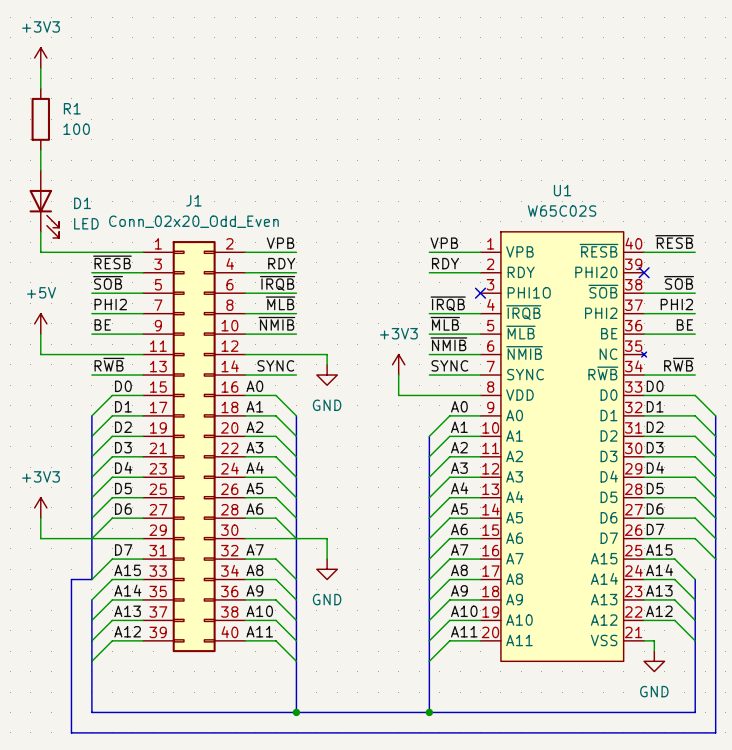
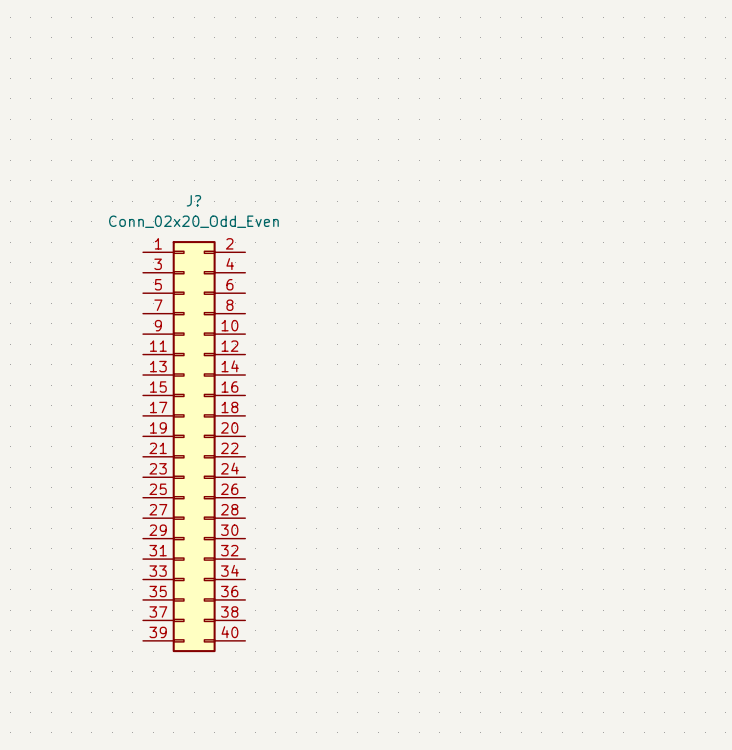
power symbol: +3V3 (40, 58) -> none
wire: (40, 68) (40, 88) -> none
R1: 100 (40, 119) -> none
wire: (40, 150) (40, 170) -> none
J1 name: J1 (193, 200) -> J? (193, 200)
D1: LED (44, 204) -> none
wire: (40, 231) (40, 252) (143, 252) -> none
label: ~{RESB} (674, 241) -> none
label: VPB (280, 243) -> none
label: VPB (444, 243) -> none
wire: (245, 252) (296, 252) -> none
wire: (429, 252) (480, 252) -> none
wire: (644, 252) (695, 252) -> none
label: ~{RESB} (112, 262) -> none
label: RDY (281, 263) -> none
label: RDY (445, 263) -> none
wire: (91, 272) (143, 272) -> none
wire: (245, 272) (296, 272) -> none
wire: (429, 272) (480, 272) -> none
no-connect mark: (644, 272) -> none
label: ~{SOB} (108, 282) -> none
label: ~{SOB} (679, 282) -> none
label: ~{IRQB} (277, 283) -> none
wire: (91, 293) (143, 293) -> none
wire: (245, 293) (296, 293) -> none
no-connect mark: (480, 293) -> none
wire: (644, 293) (695, 293) -> none
label: ~{MLB} (280, 303) -> none
label: ~{IRQB} (448, 303) -> none
label: PHI2 (110, 304) -> none
label: PHI2 (676, 304) -> none
wire: (91, 313) (143, 313) -> none
wire: (245, 313) (296, 313) -> none
wire: (429, 313) (480, 313) -> none
wire: (644, 313) (695, 313) -> none
power symbol: +5V (40, 323) -> none
label: ~{NMIB} (276, 323) -> none
label: ~{MLB} (445, 323) -> none
label: BE (102, 324) -> none
label: BE (684, 324) -> none
wire: (40, 334) (40, 354) (143, 354) -> none
wire: (91, 334) (143, 334) -> none
wire: (245, 334) (296, 334) -> none
wire: (429, 334) (480, 334) -> none
wire: (644, 334) (695, 334) -> none
label: ~{NMIB} (448, 344) -> none
wire: (245, 354) (327, 354) (327, 364) -> none
wire: (429, 354) (480, 354) -> none
label: R~{WB} (109, 364) -> none
power symbol: +3V3 (398, 364) -> none
label: R~{WB} (679, 364) -> none
label: SYNC (275, 365) -> none
label: SYNC (449, 365) -> none
wire: (91, 375) (143, 375) -> none
wire: (245, 375) (296, 375) -> none
power symbol: GND (327, 375) -> none
wire: (398, 375) (398, 395) (480, 395) -> none
wire: (429, 375) (480, 375) -> none
wire: (644, 375) (695, 375) -> none
label: D0 (123, 386) -> none
label: A0 (254, 386) -> none
label: D0 (655, 386) -> none
wire: (143, 395) (112, 395) (91, 415) -> none
wire: (245, 395) (275, 395) (296, 415) -> none
wire: (644, 395) (695, 395) (715, 415) -> none
label: D1 (123, 406) -> none
label: A1 (254, 406) -> none
label: A0 (459, 406) -> none
label: D1 (655, 406) -> none
bus: (91, 415) (91, 579) (71, 579) (71, 732) (715, 732) (715, 415) -> none
wire: (143, 415) (112, 415) (91, 436) -> none
wire: (245, 415) (275, 415) (296, 436) -> none
bus: (296, 415) (296, 712) -> none
wire: (480, 415) (449, 415) (429, 436) -> none
wire: (644, 415) (695, 415) (715, 436) -> none
label: D2 (123, 427) -> none
label: A2 (254, 427) -> none
label: A1 (459, 427) -> none
label: D2 (655, 427) -> none
wire: (143, 436) (112, 436) (91, 456) -> none
wire: (245, 436) (275, 436) (296, 456) -> none
bus: (429, 436) (429, 712) -> none
wire: (480, 436) (449, 436) (429, 456) -> none
wire: (644, 436) (695, 436) (715, 456) -> none
U1: W65C02S (563, 446) -> none
label: D3 (123, 447) -> none
label: A3 (254, 447) -> none
label: A2 (459, 447) -> none
label: D3 (655, 447) -> none
wire: (143, 456) (112, 456) (91, 477) -> none
wire: (245, 456) (275, 456) (296, 477) -> none
wire: (480, 456) (449, 456) (429, 477) -> none
wire: (644, 456) (695, 456) (715, 477) -> none
label: D4 (123, 467) -> none
label: A4 (255, 467) -> none
label: D4 (655, 467) -> none
label: A3 (459, 468) -> none
wire: (143, 477) (112, 477) (91, 497) -> none
wire: (245, 477) (275, 477) (296, 497) -> none
wire: (480, 477) (449, 477) (429, 497) -> none
wire: (644, 477) (695, 477) (715, 497) -> none
label: D5 (123, 488) -> none
label: A5 (254, 488) -> none
label: A4 (459, 488) -> none
label: D5 (655, 488) -> none
wire: (143, 497) (112, 497) (91, 518) -> none
wire: (245, 497) (275, 497) (296, 518) -> none
wire: (480, 497) (449, 497) (429, 518) -> none
wire: (644, 497) (695, 497) (715, 518) -> none
power symbol: +3V3 (40, 507) -> none
label: D6 (123, 509) -> none
label: A6 (254, 509) -> none
label: A5 (459, 509) -> none
label: D6 (655, 509) -> none
wire: (40, 518) (40, 538) (143, 538) -> none
wire: (143, 518) (112, 518) (91, 538) -> none
wire: (245, 518) (275, 518) (296, 538) -> none
wire: (480, 518) (449, 518) (429, 538) -> none
wire: (644, 518) (695, 518) (715, 538) -> none
label: A6 (459, 529) -> none
label: D7 (655, 529) -> none
wire: (245, 538) (327, 538) (327, 559) -> none
wire: (480, 538) (449, 538) (429, 559) -> none
wire: (644, 538) (695, 538) (715, 559) -> none
label: D7 (123, 549) -> none
label: A7 (255, 549) -> none
label: A7 (459, 549) -> none
label: A15 (659, 549) -> none
wire: (143, 559) (112, 559) (91, 579) -> none
wire: (245, 559) (275, 559) (296, 579) -> none
wire: (480, 559) (449, 559) (429, 579) -> none
wire: (644, 559) (674, 559) (695, 579) -> none
power symbol: GND (327, 569) -> none
label: A15 (127, 570) -> none
label: A8 (254, 570) -> none
label: A8 (459, 570) -> none
label: A14 (659, 570) -> none
wire: (143, 579) (112, 579) (91, 599) -> none
wire: (245, 579) (275, 579) (296, 599) -> none
wire: (480, 579) (449, 579) (429, 599) -> none
wire: (644, 579) (674, 579) (695, 599) -> none
bus: (695, 579) (695, 712) (91, 712) (91, 599) -> none
label: A14 (127, 590) -> none
label: A9 (254, 590) -> none
label: A9 (459, 590) -> none
label: A13 (659, 590) -> none
wire: (143, 599) (112, 599) (91, 620) -> none
wire: (245, 599) (275, 599) (296, 620) -> none
wire: (480, 599) (449, 599) (429, 620) -> none
wire: (644, 599) (674, 599) (695, 620) -> none
label: A13 (127, 611) -> none
label: A10 (259, 611) -> none
label: A10 (464, 611) -> none
label: A12 (659, 611) -> none
wire: (143, 620) (112, 620) (91, 640) -> none
wire: (245, 620) (275, 620) (296, 640) -> none
wire: (480, 620) (449, 620) (429, 640) -> none
wire: (644, 620) (674, 620) (695, 640) -> none
label: A12 (127, 631) -> none
label: A11 (259, 631) -> none
label: A11 (464, 631) -> none
wire: (143, 640) (112, 640) (91, 661) -> none
wire: (245, 640) (275, 640) (296, 661) -> none
wire: (480, 640) (449, 640) (429, 661) -> none
wire: (644, 640) (654, 640) (654, 651) -> none
power symbol: GND (654, 661) -> none
junction: (296, 712) -> none
junction: (429, 712) -> none

